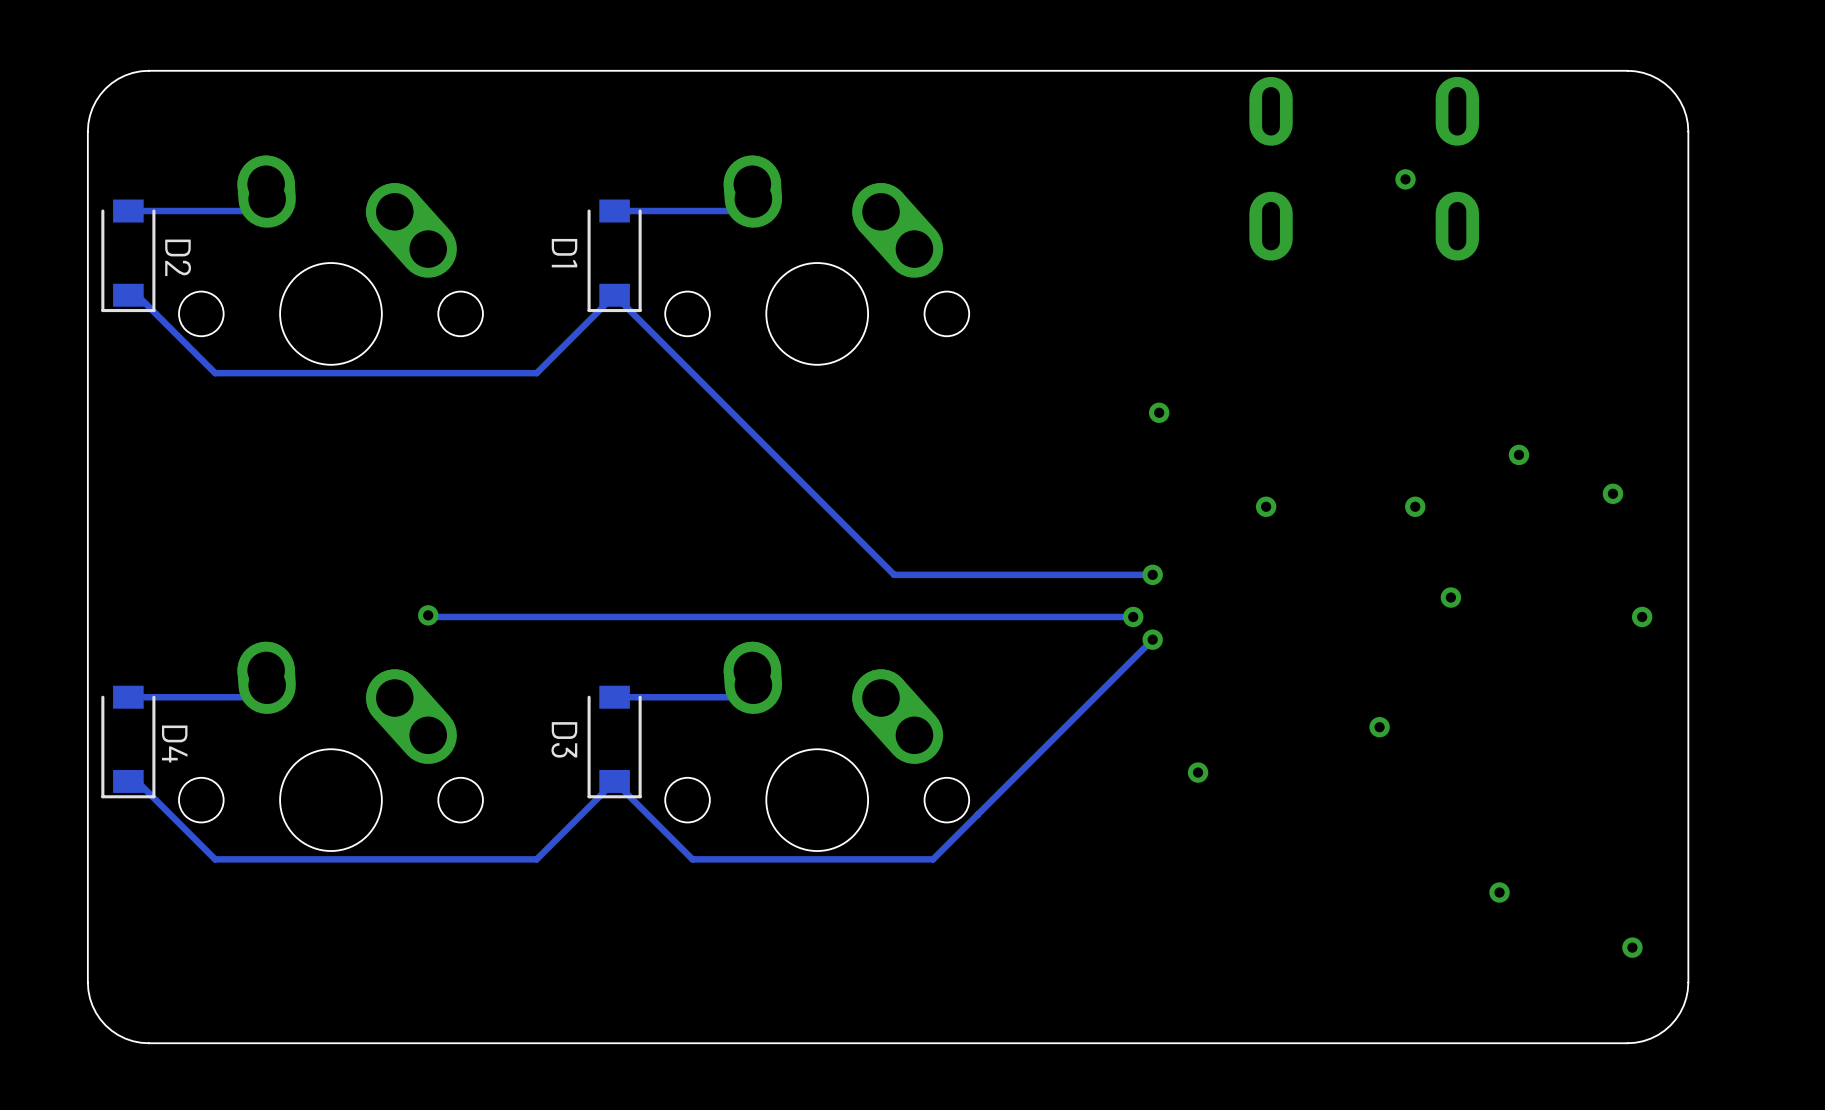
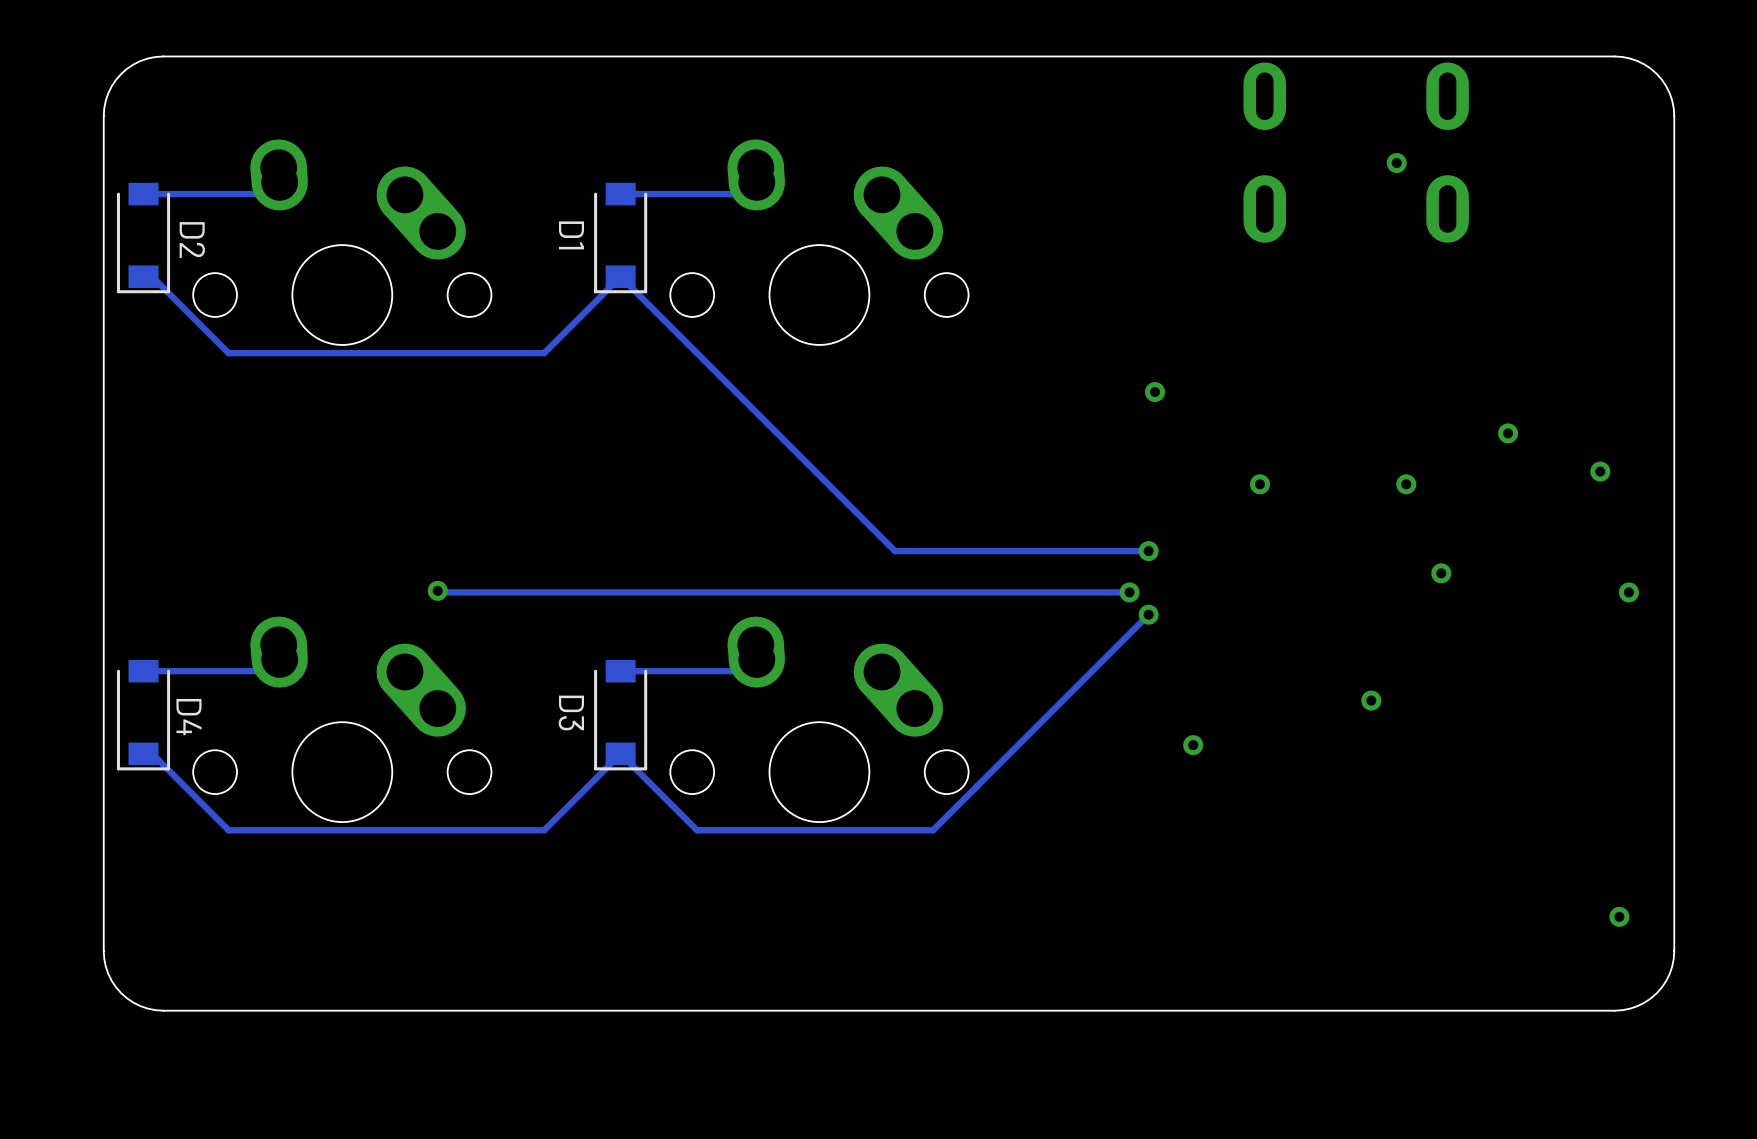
via: (1499, 892) -> none

